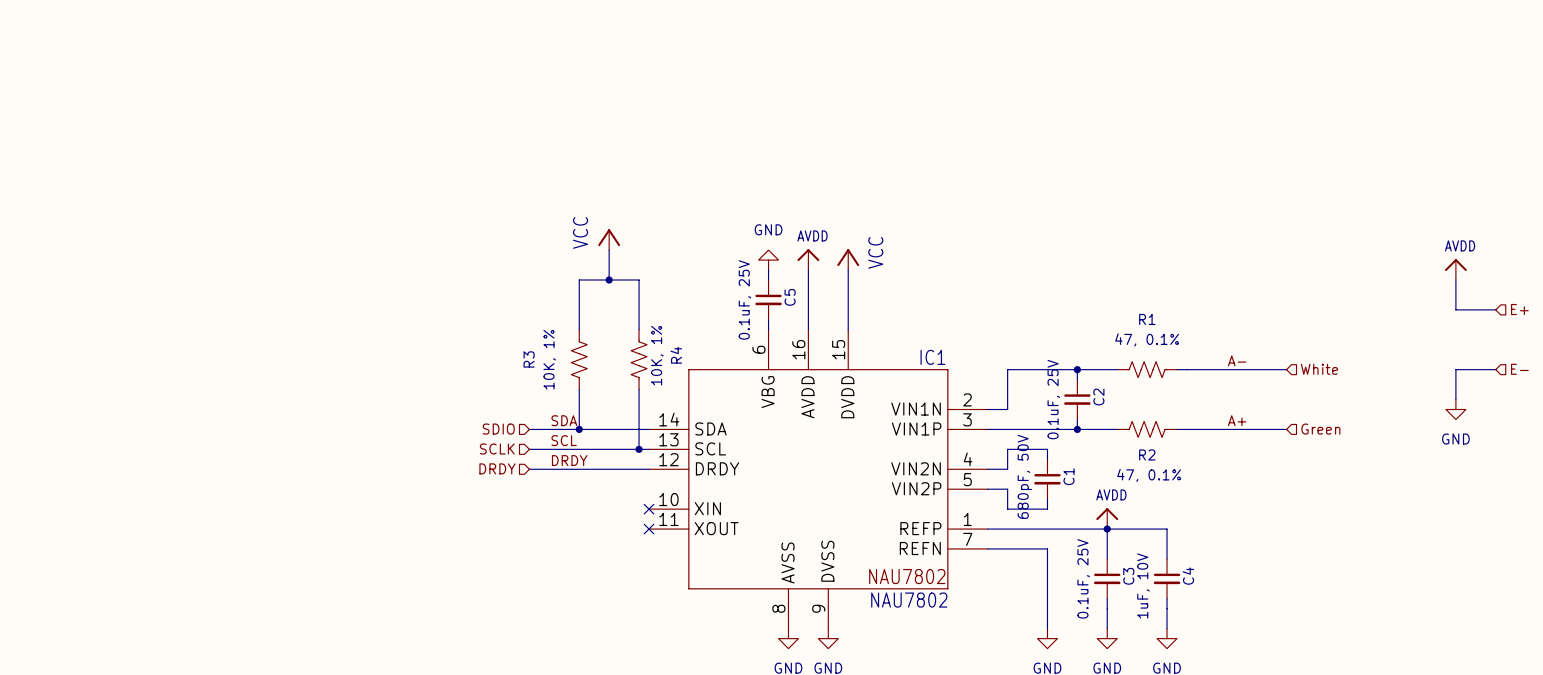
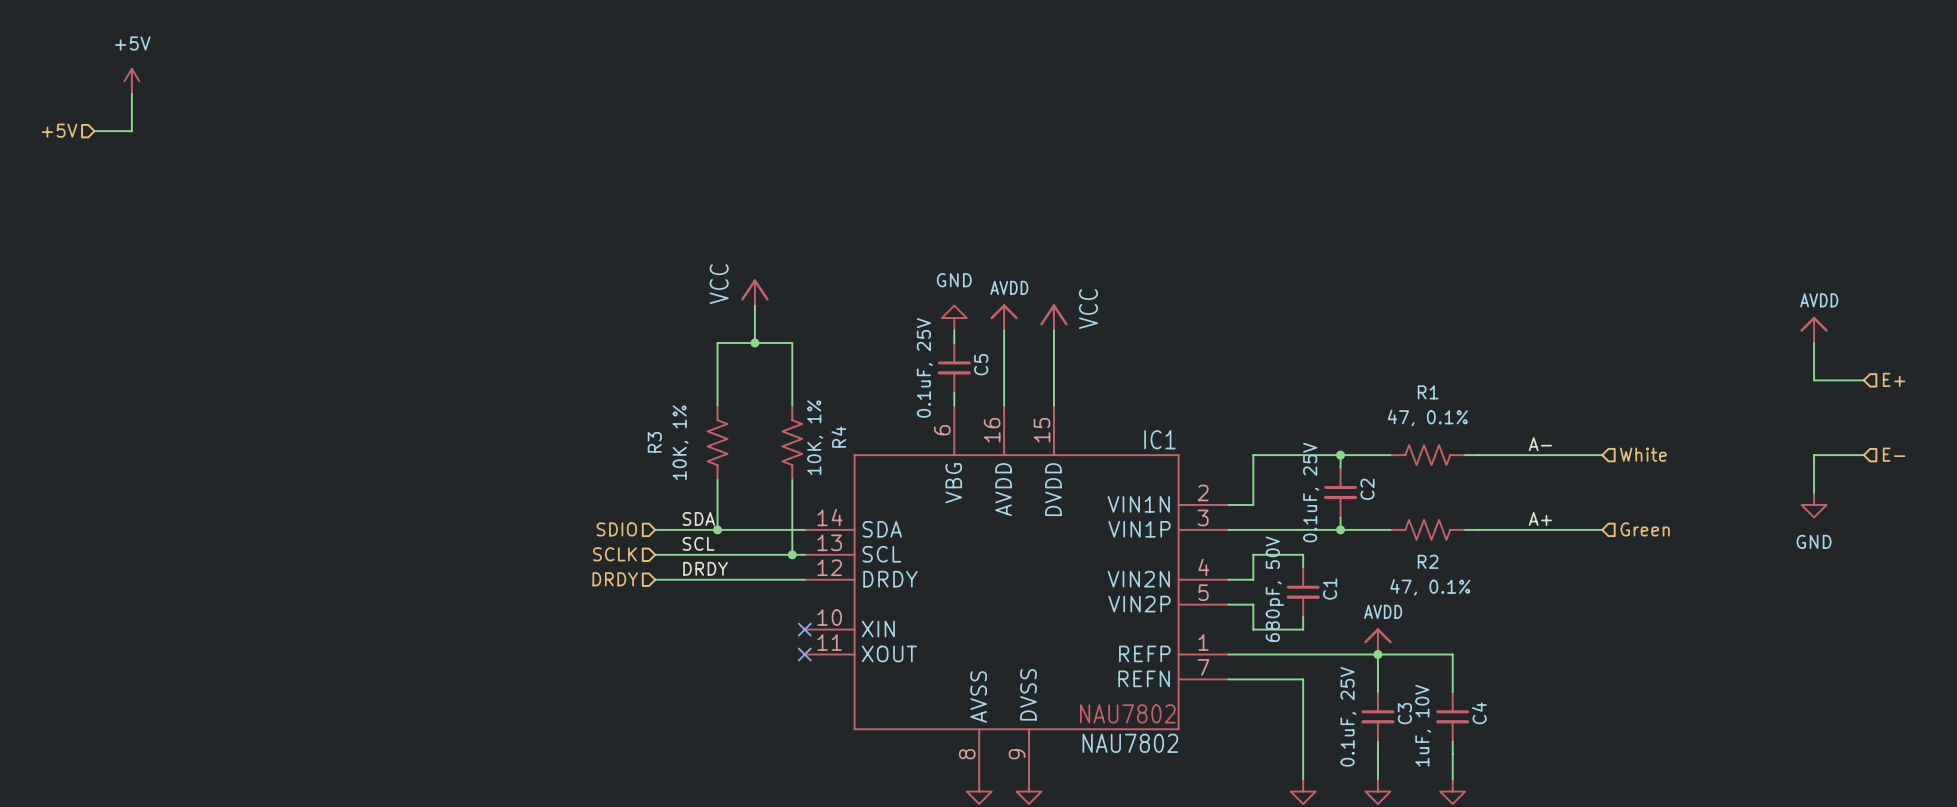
power symbol: none -> +5V (131, 81)
wire: none -> (131, 93) (131, 131) (94, 131)
hierarchical label: none -> +5V (59, 130)

